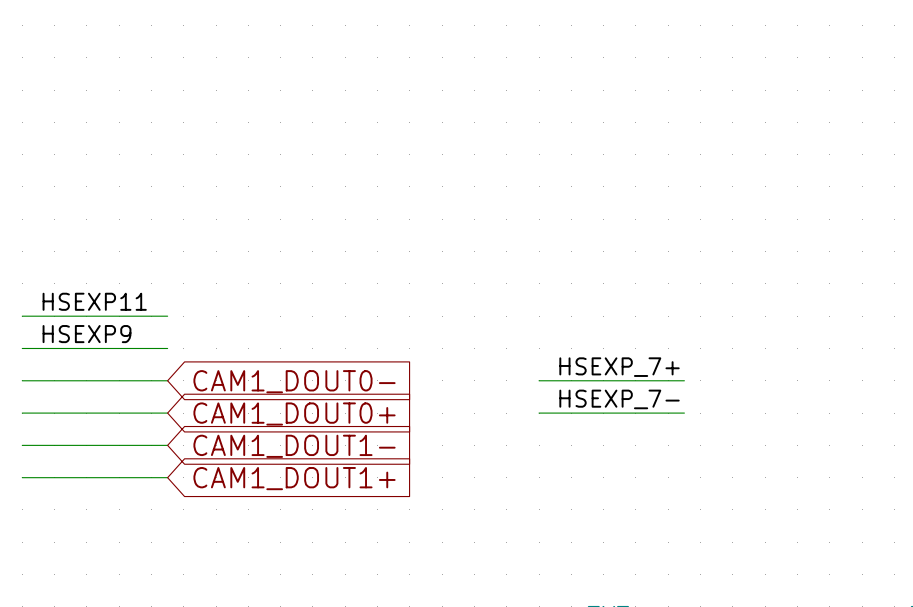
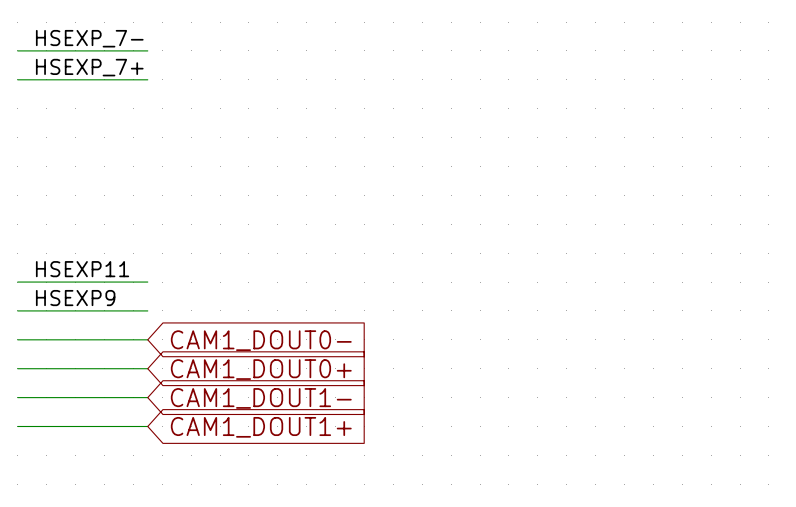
label: none -> HSEXP_7- (89, 38)
wire: none -> (17, 50) (147, 50)
label: none -> HSEXP_7+ (89, 67)
wire: none -> (17, 79) (147, 79)
label: HSEXP_7+ (619, 367) -> none
wire: (539, 380) (684, 380) -> none
label: HSEXP_7- (619, 399) -> none
wire: (539, 413) (684, 413) -> none

